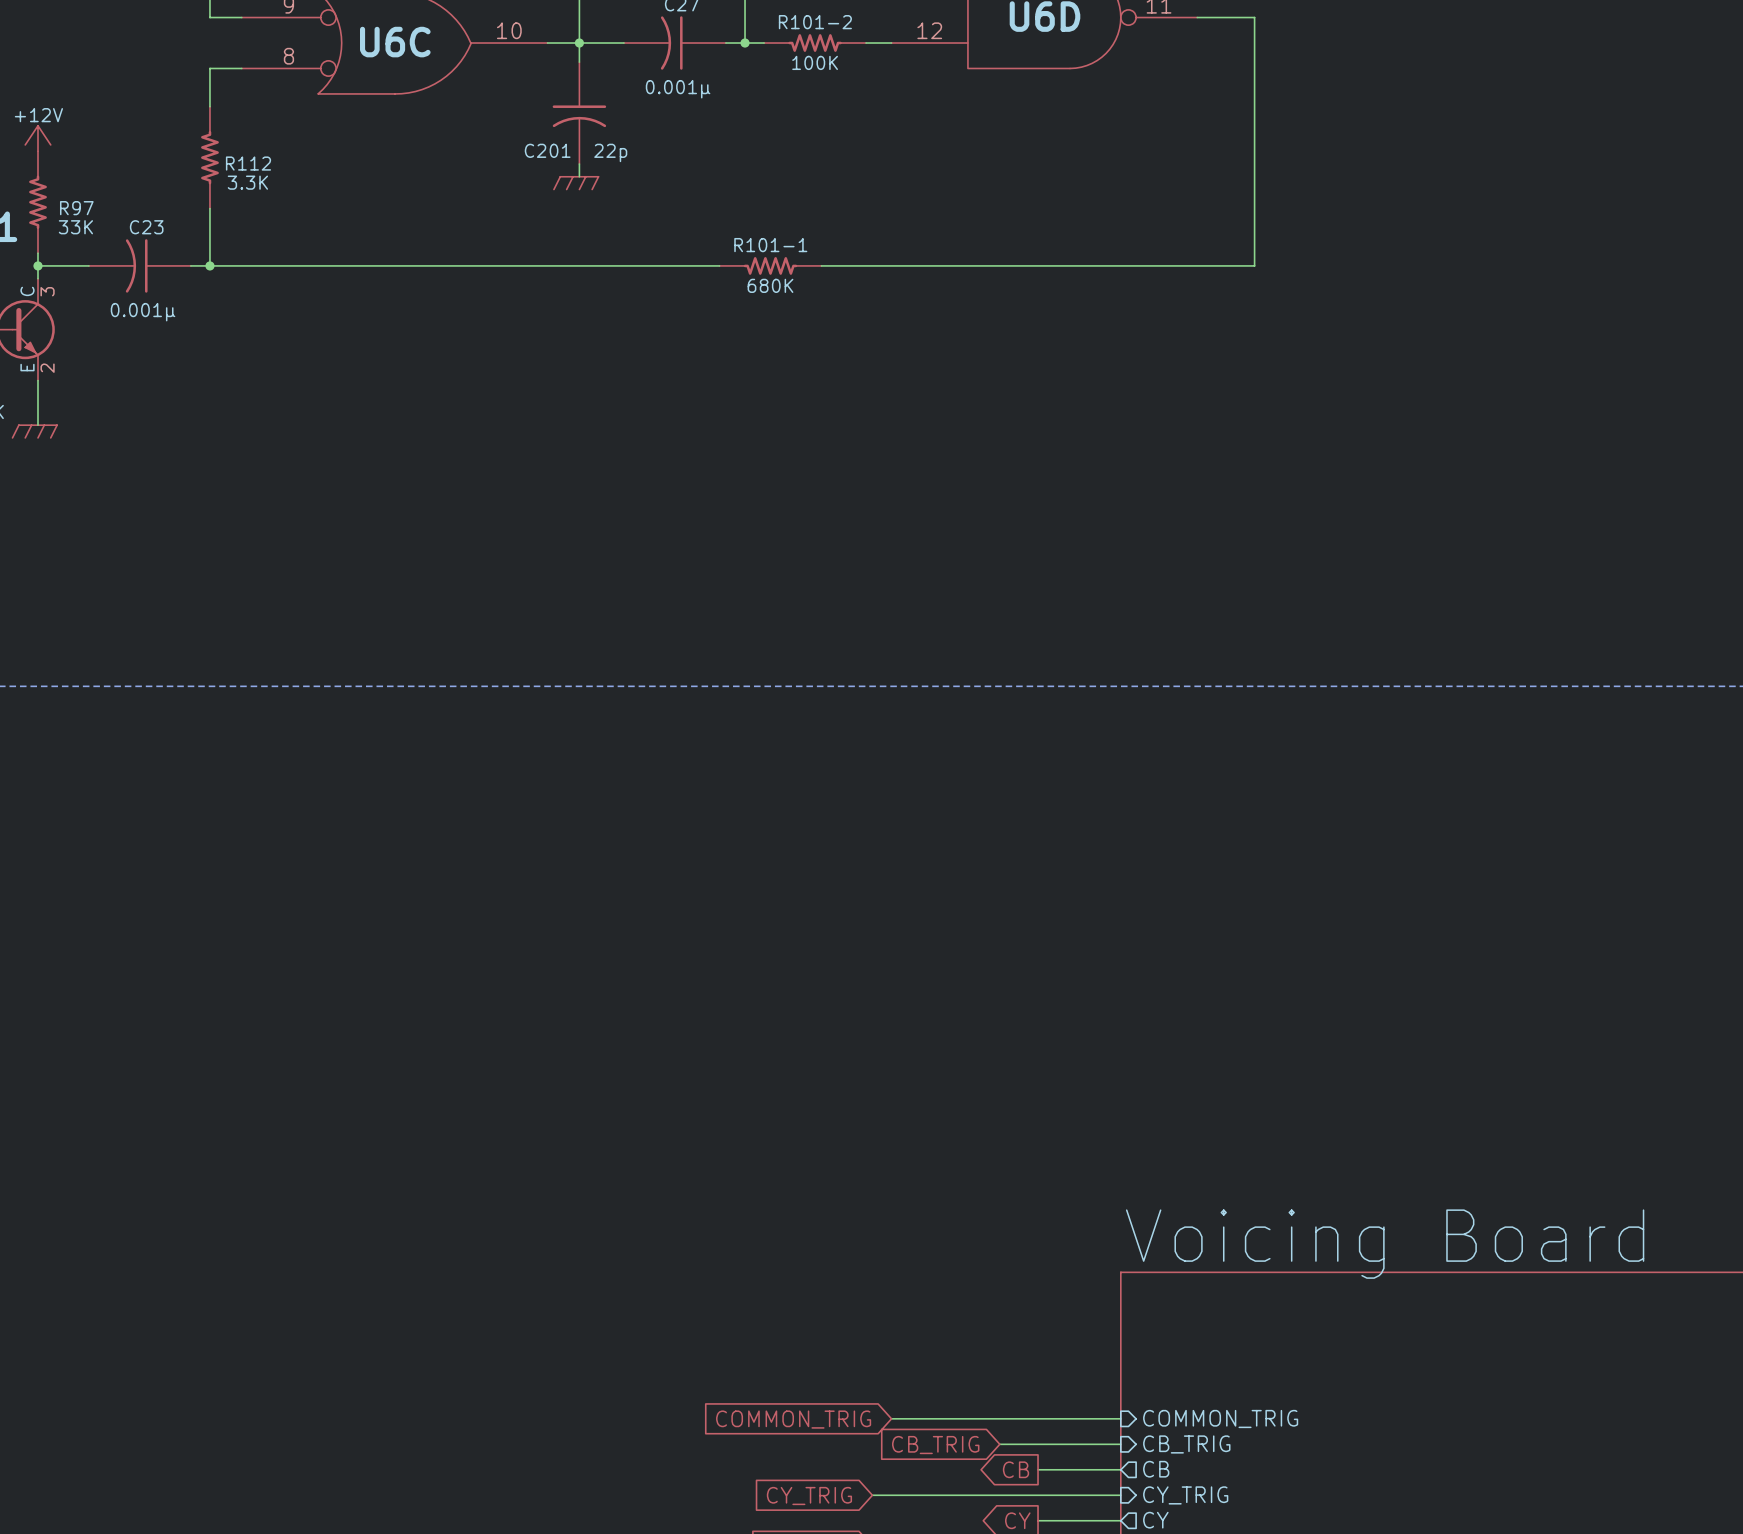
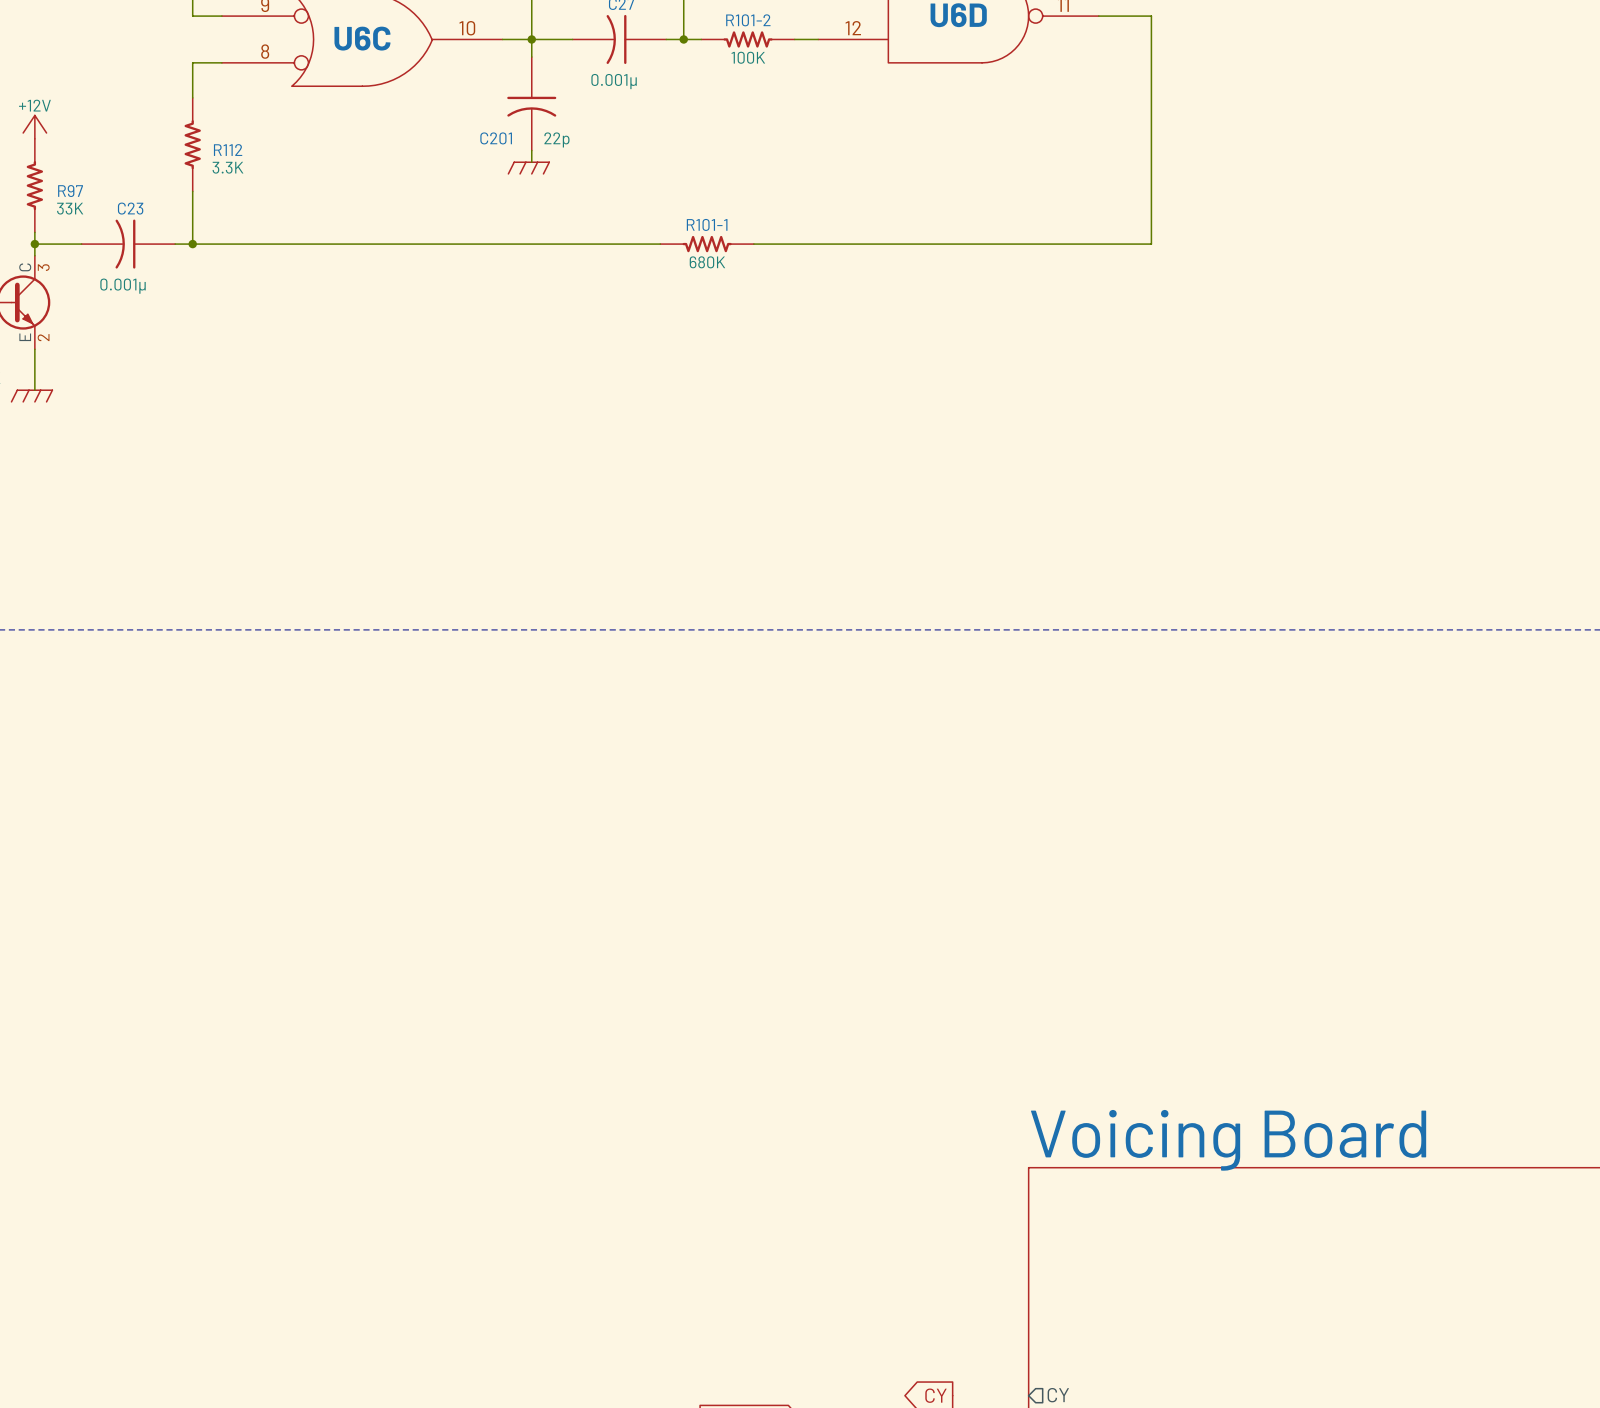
wire: (891, 1418) (1120, 1418) -> none
sheet pin: COMMON_TRIG (1220, 1418) -> none
global label: COMMON_TRIG (793, 1419) -> none
wire: (999, 1444) (1120, 1444) -> none
sheet pin: CB_TRIG (1186, 1444) -> none
global label: CB_TRIG (935, 1445) -> none
global label: CB (1015, 1469) -> none
wire: (1038, 1469) (1120, 1469) -> none
sheet pin: CB (1156, 1469) -> none
wire: (872, 1495) (1120, 1495) -> none
sheet pin: CY_TRIG (1185, 1495) -> none
global label: CY_TRIG (809, 1496) -> none
wire: (1038, 1520) (1120, 1520) -> none

